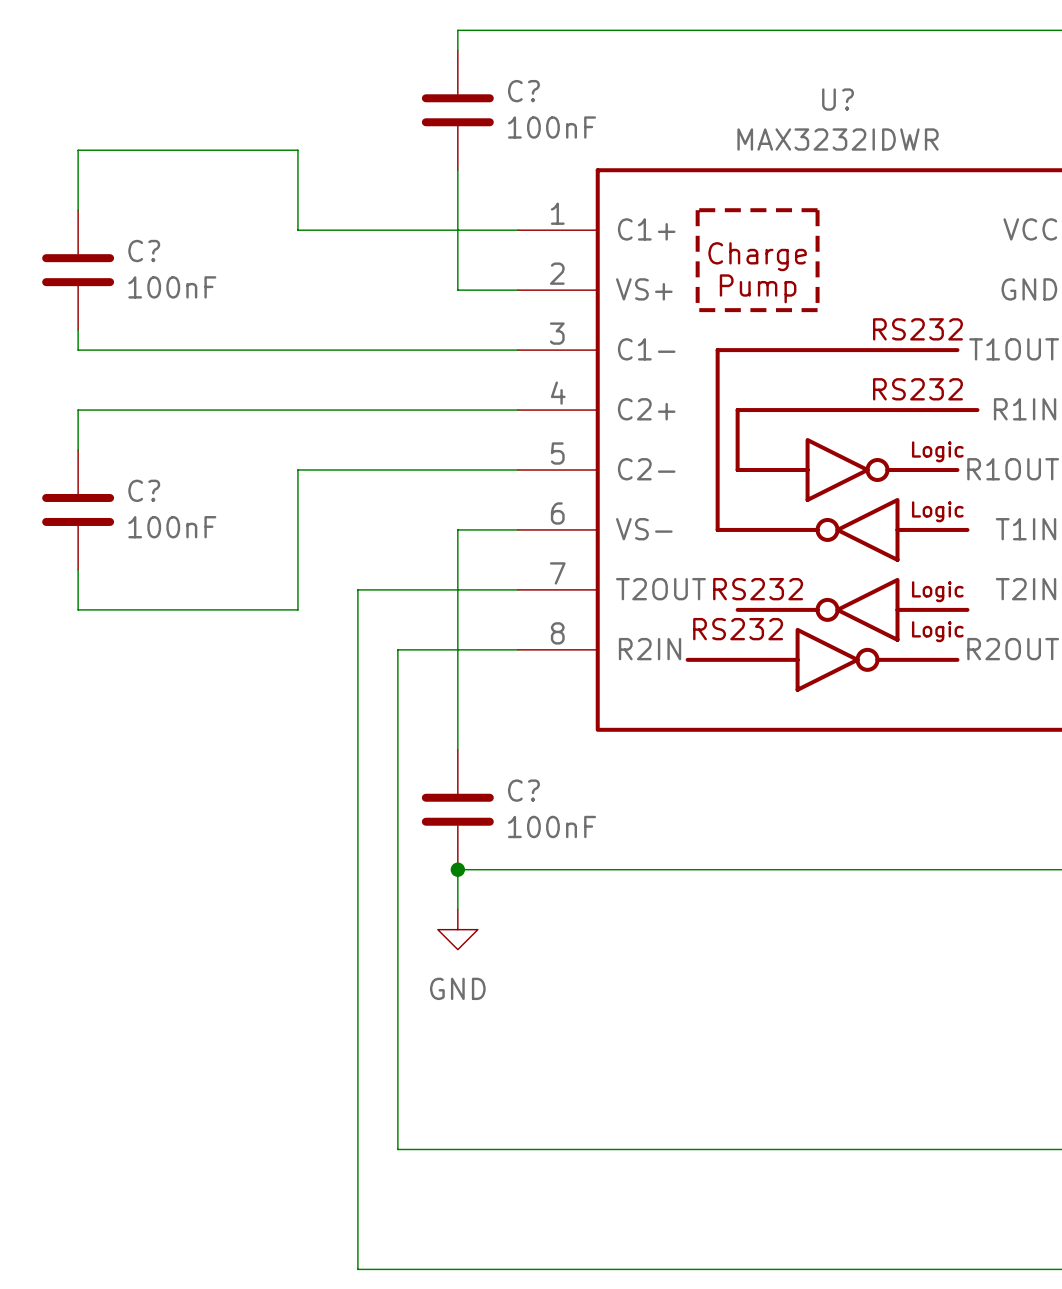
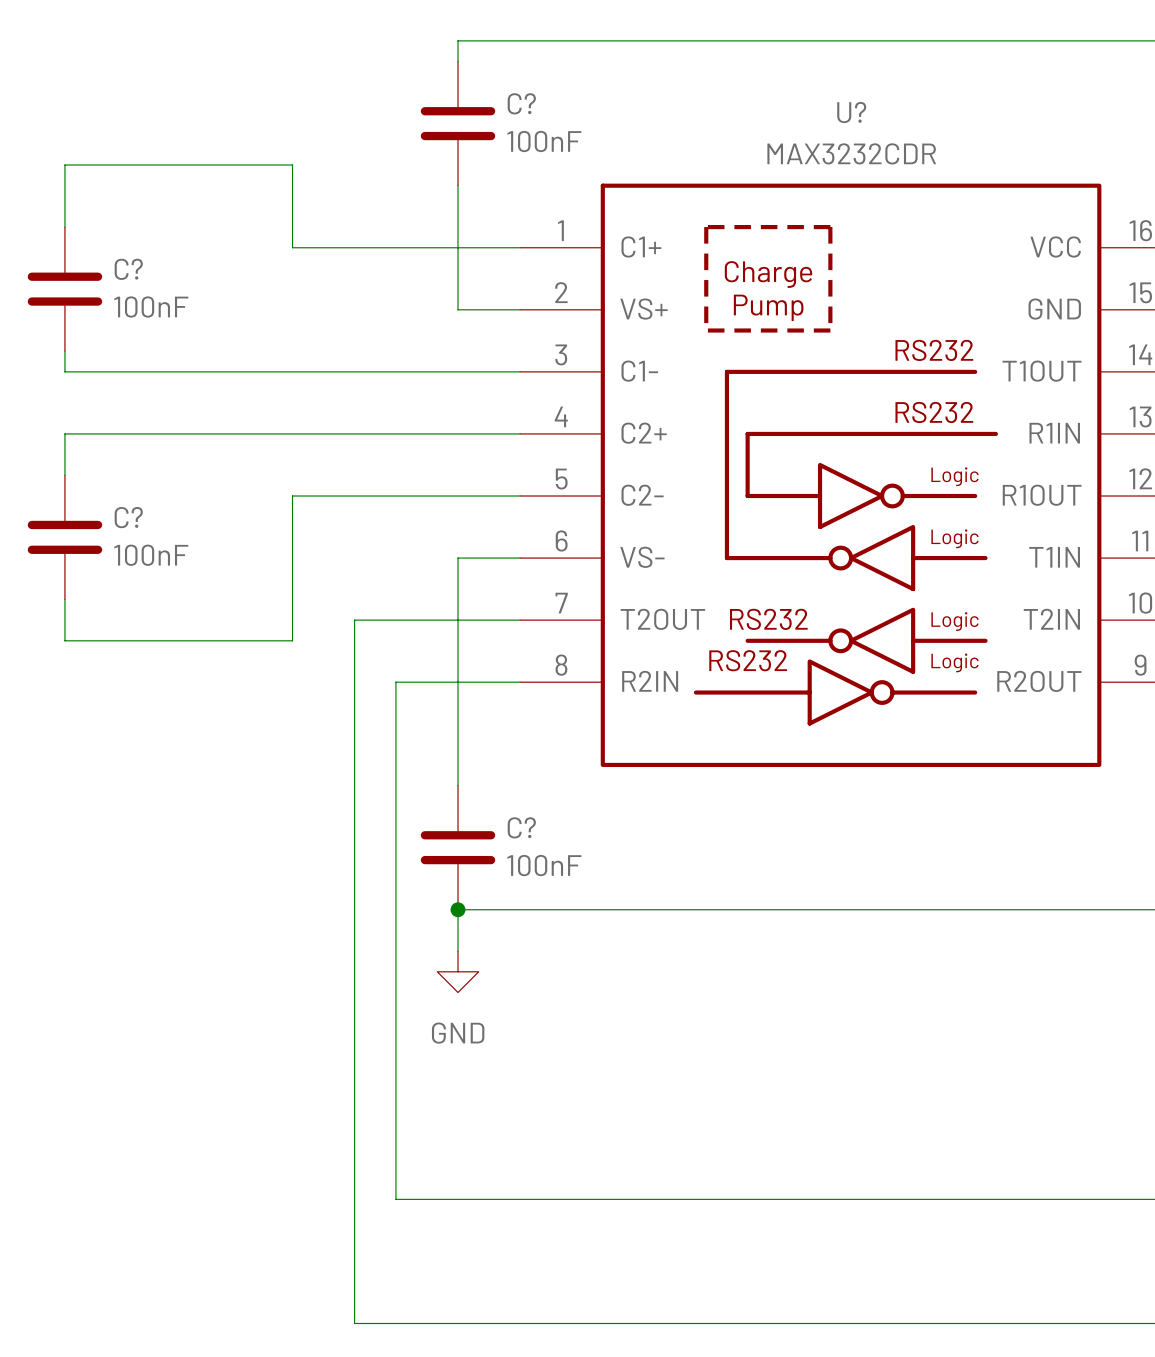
U? value: MAX3232IDWR (838, 139) -> MAX3232CDR (851, 153)

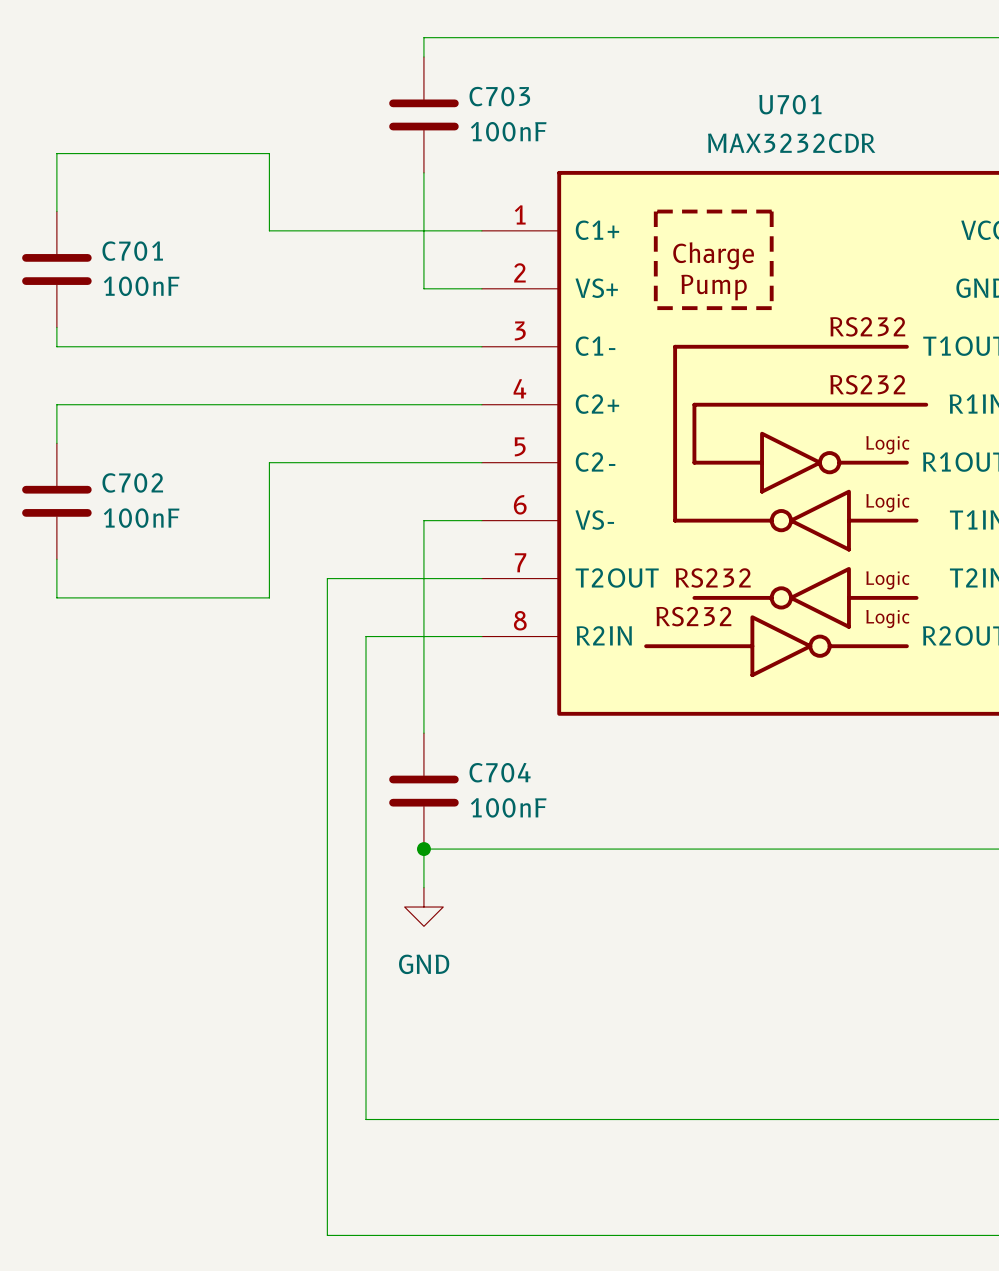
C? name: C? (521, 103) -> C703 (499, 96)
U? name: U? (851, 112) -> U701 (790, 104)
C? name: C? (128, 269) -> C701 (132, 251)
C? name: C? (128, 517) -> C702 (132, 482)
C? name: C? (521, 827) -> C704 (500, 772)

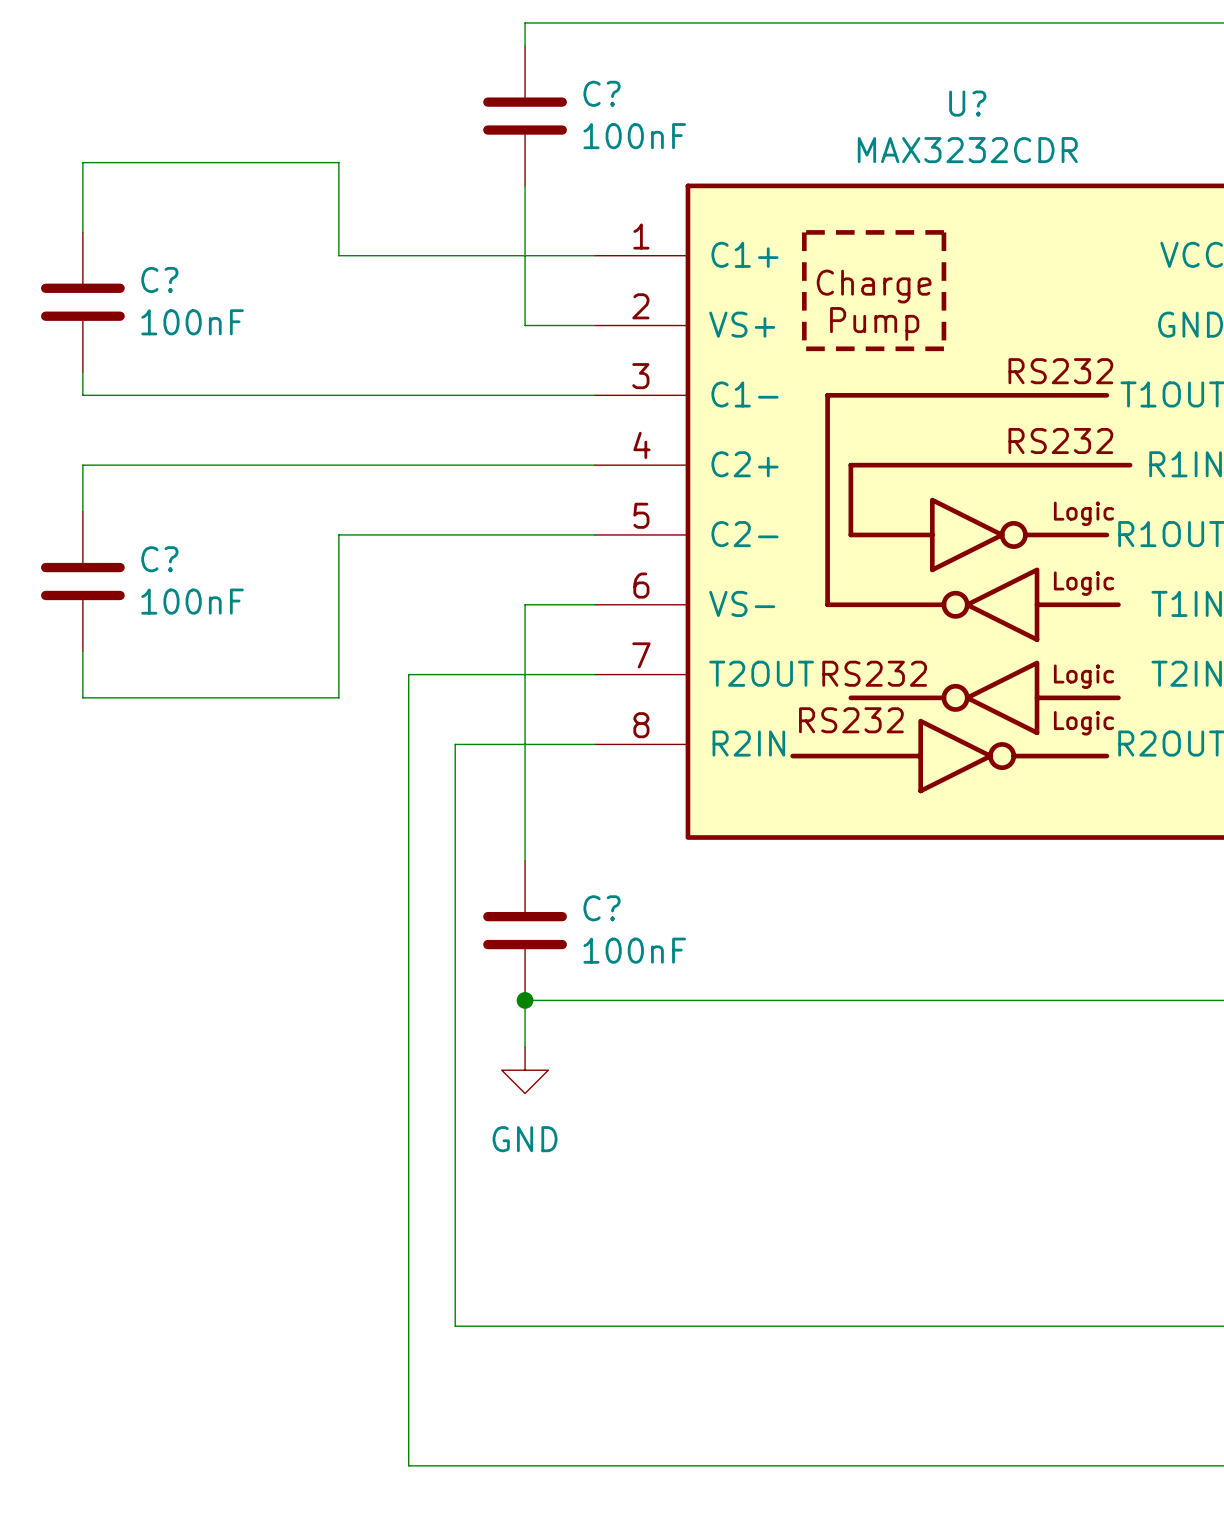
C703 name: C703 (499, 96) -> C? (602, 93)
U701 name: U701 (790, 104) -> U? (967, 103)
C701 name: C701 (132, 251) -> C? (159, 279)
C702 name: C702 (132, 482) -> C? (159, 559)
C704 name: C704 (500, 772) -> C? (602, 908)

